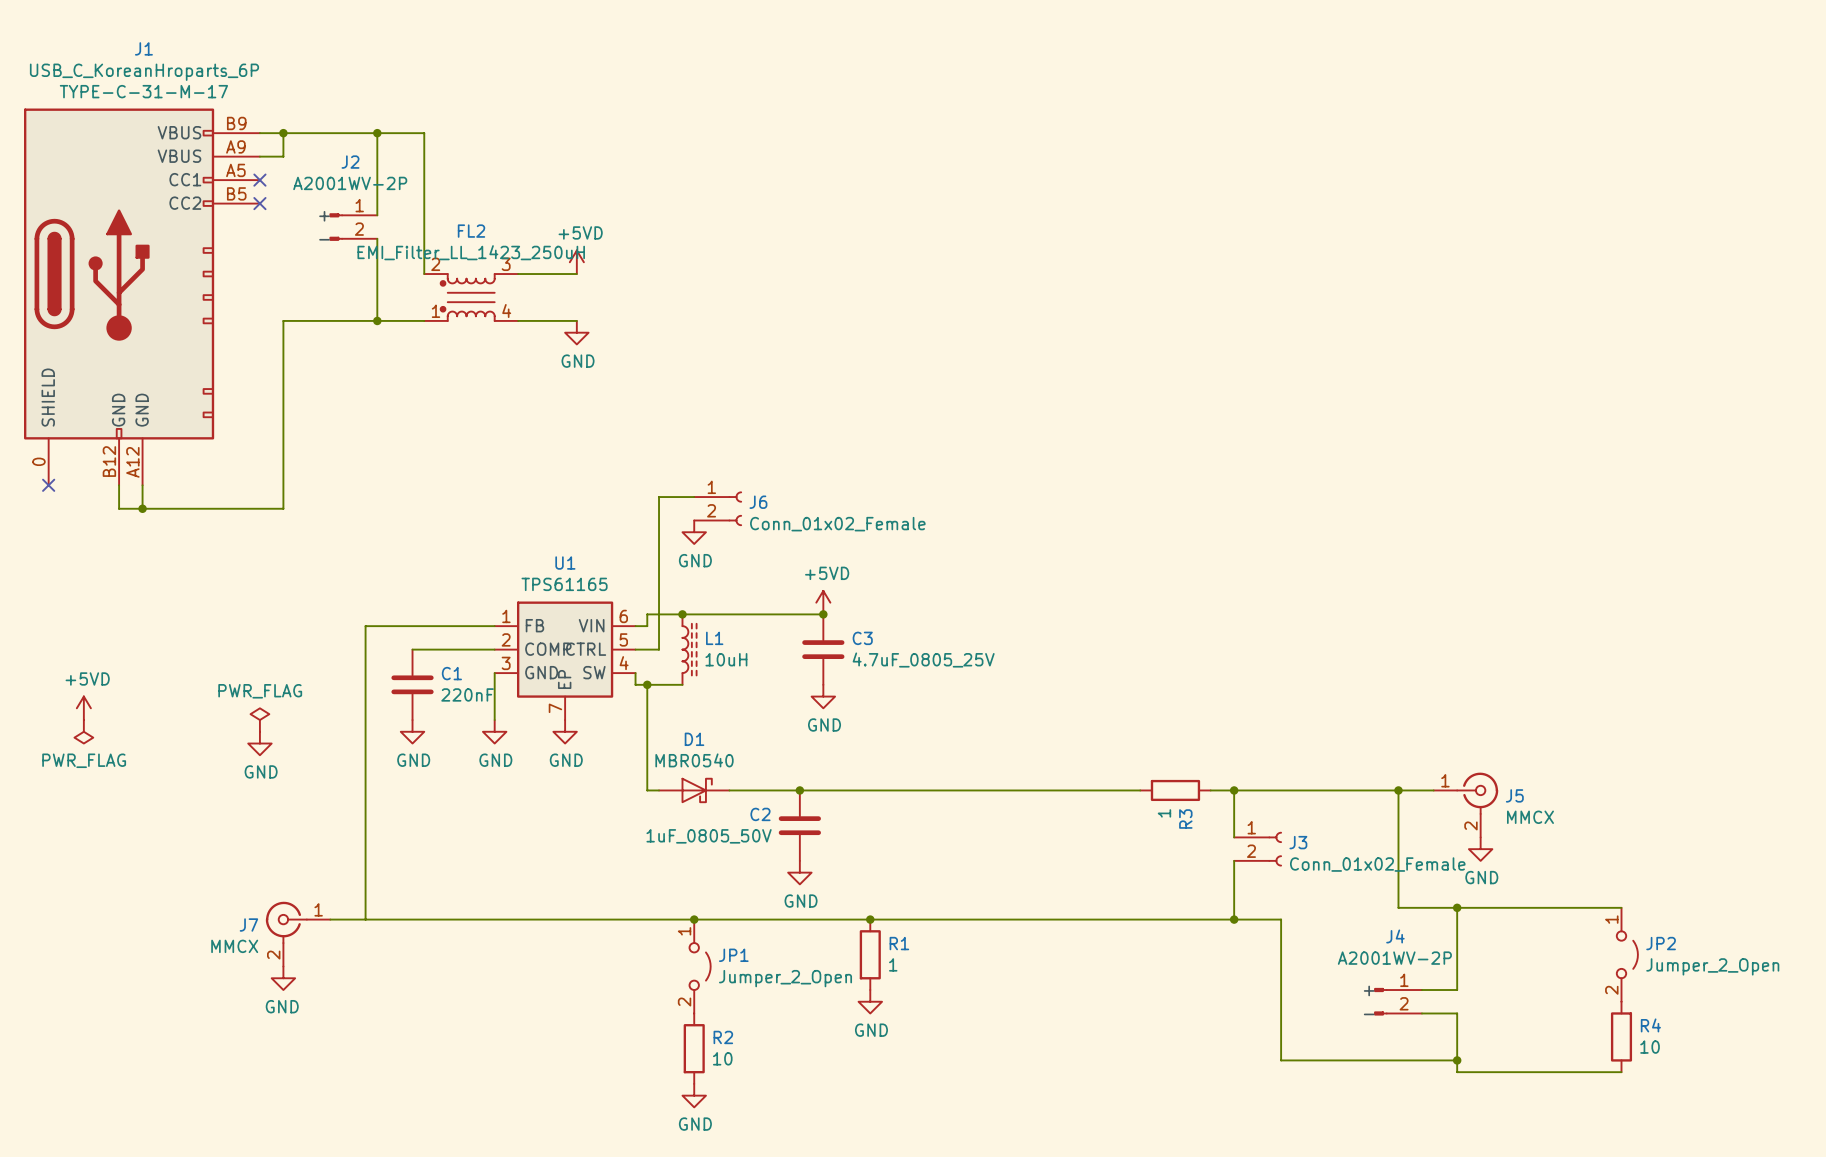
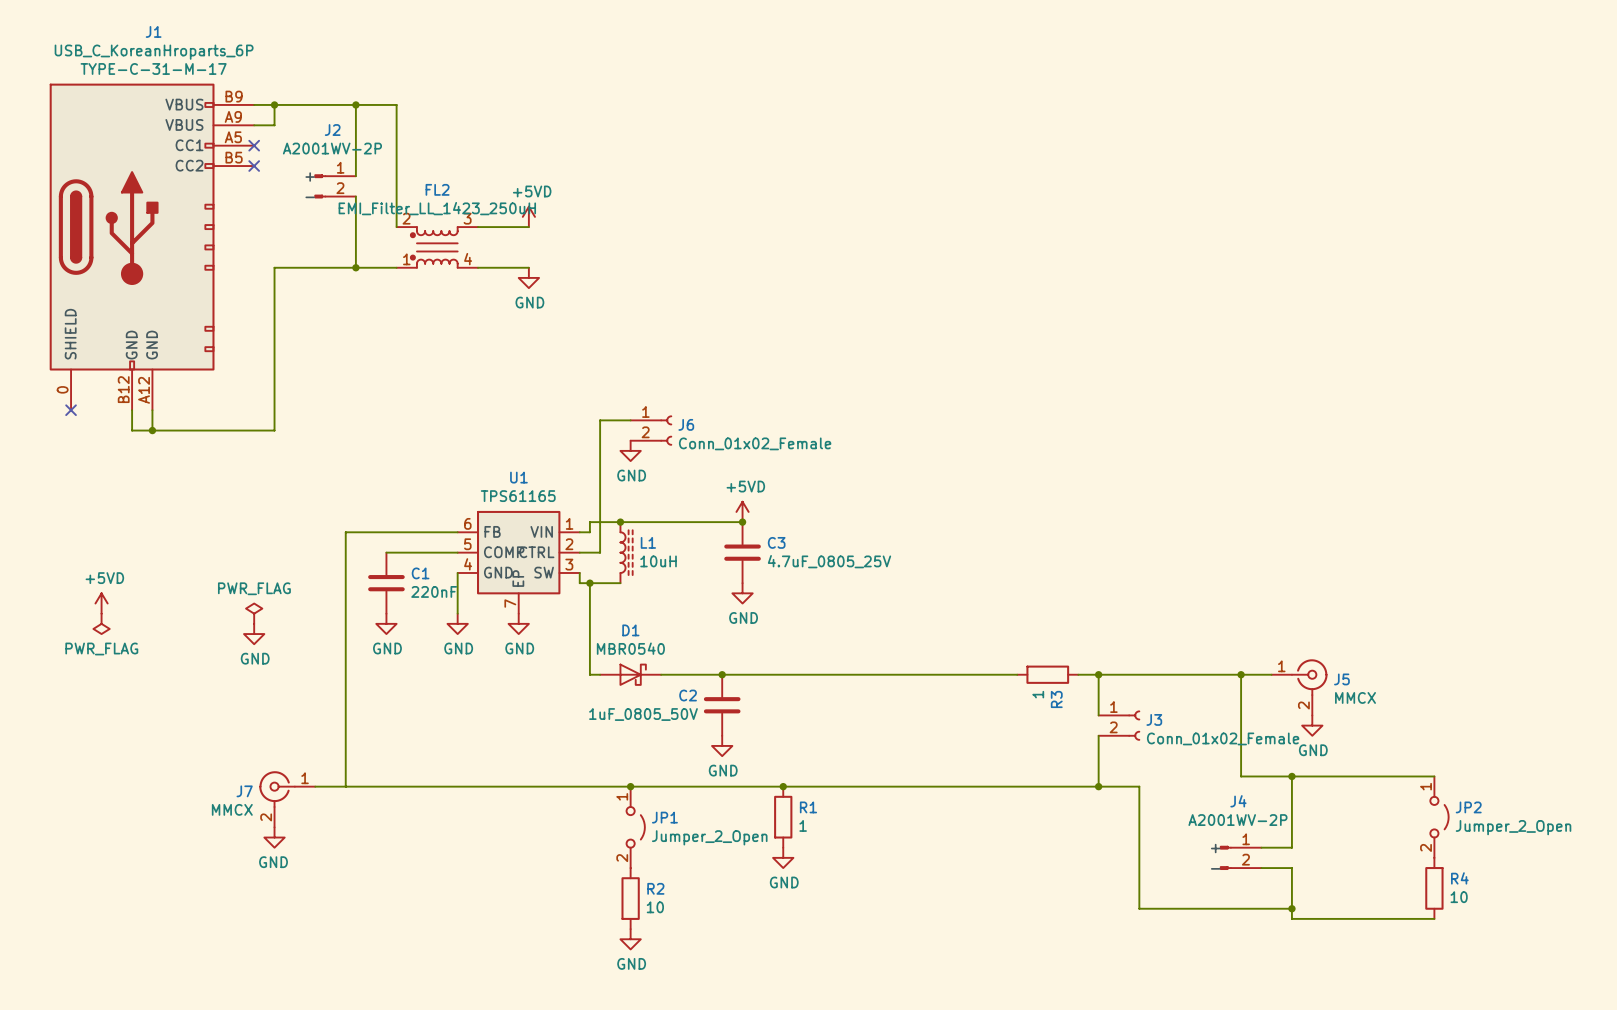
U1 pin number: 1 (506, 616) -> 6 (467, 523)
U1 pin number: 6 (623, 616) -> 1 (569, 523)
U1 pin number: 2 (506, 639) -> 5 (467, 544)
U1 pin number: 5 (623, 639) -> 2 (569, 544)
U1 pin number: 3 (506, 663) -> 4 (468, 564)
U1 pin number: 4 (624, 663) -> 3 (569, 564)

